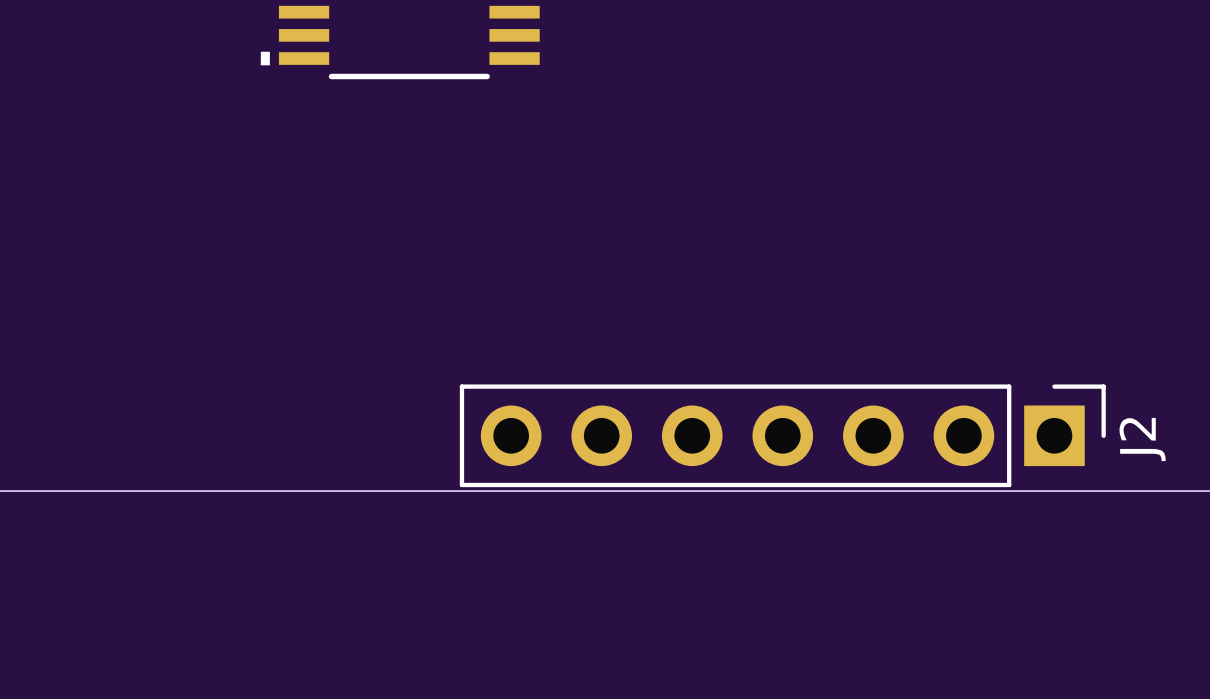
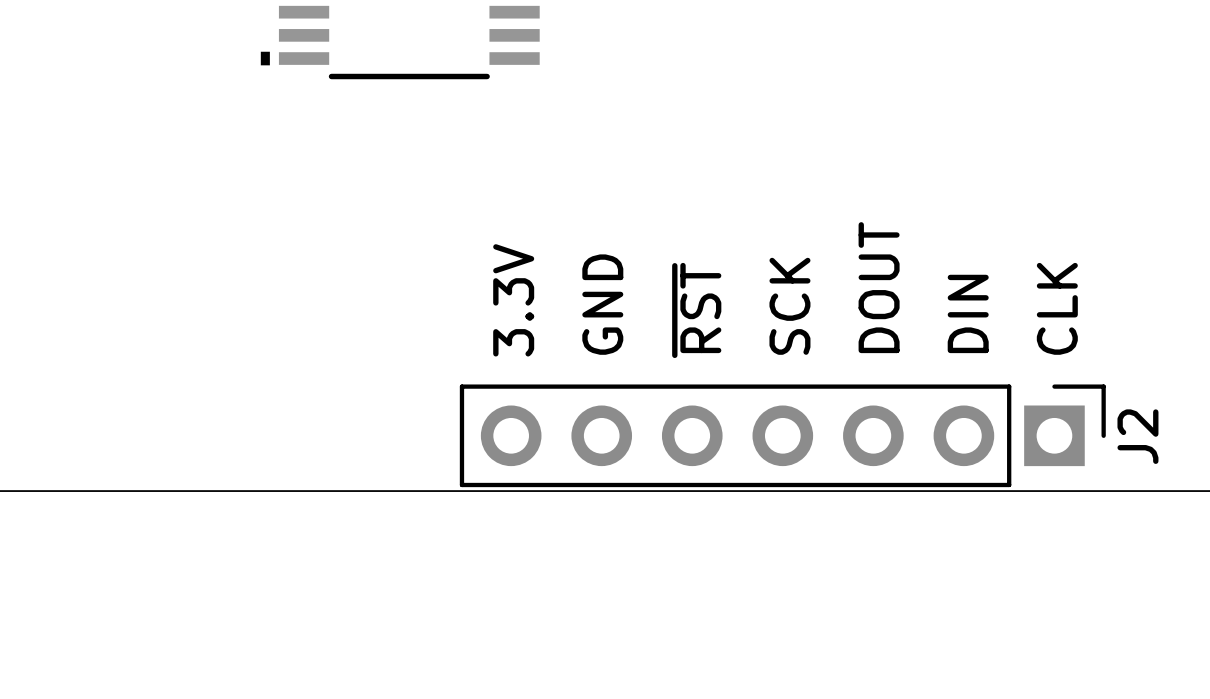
text: none -> DOUT (879, 287)
text: none -> 3.3V (513, 300)
text: none -> GND (602, 304)
text: none -> SCK (789, 306)
text: none -> ~{RST} (696, 310)
text: none -> CLK (1057, 308)
text: none -> DIN (968, 313)

